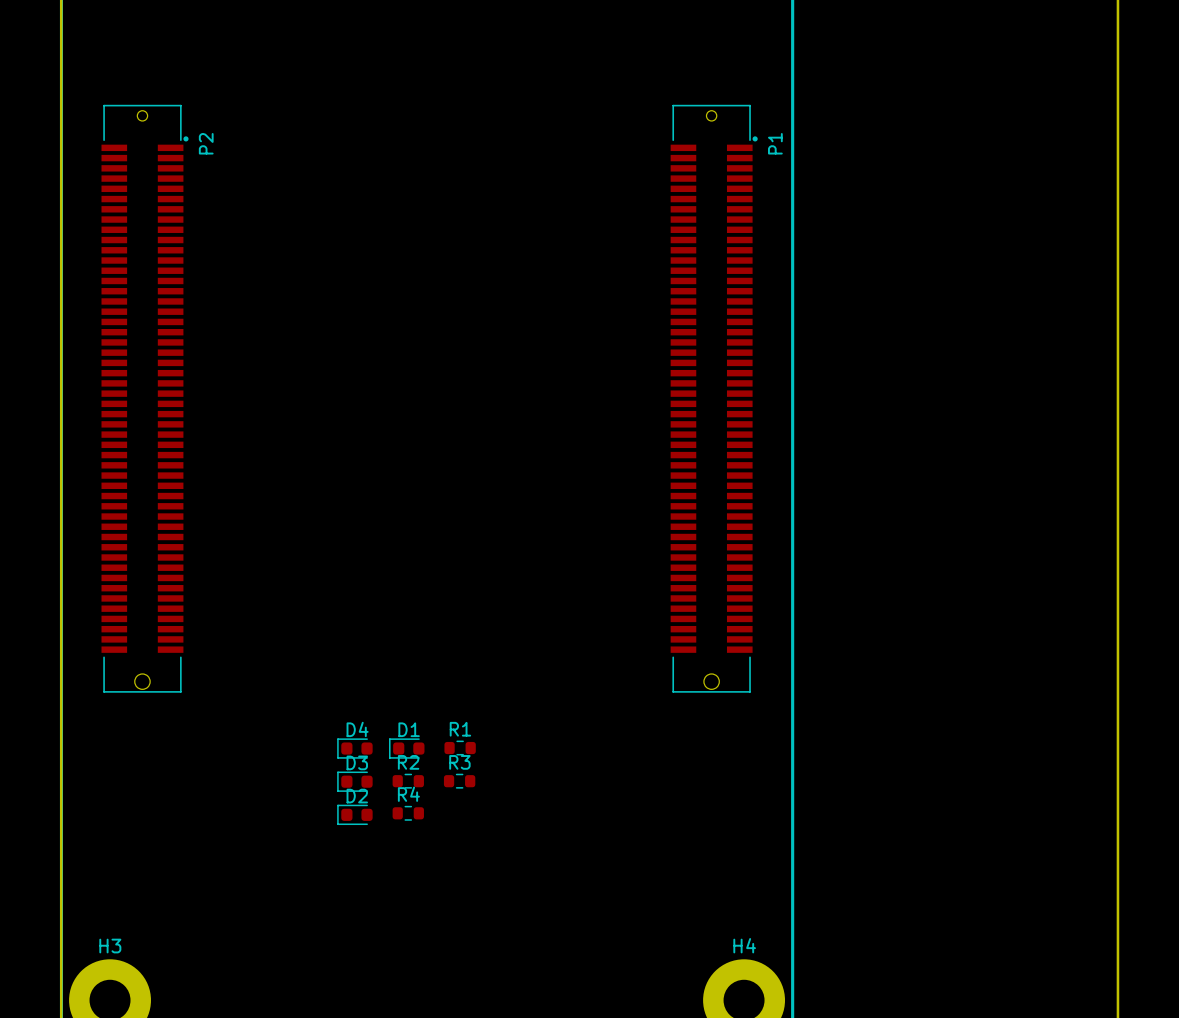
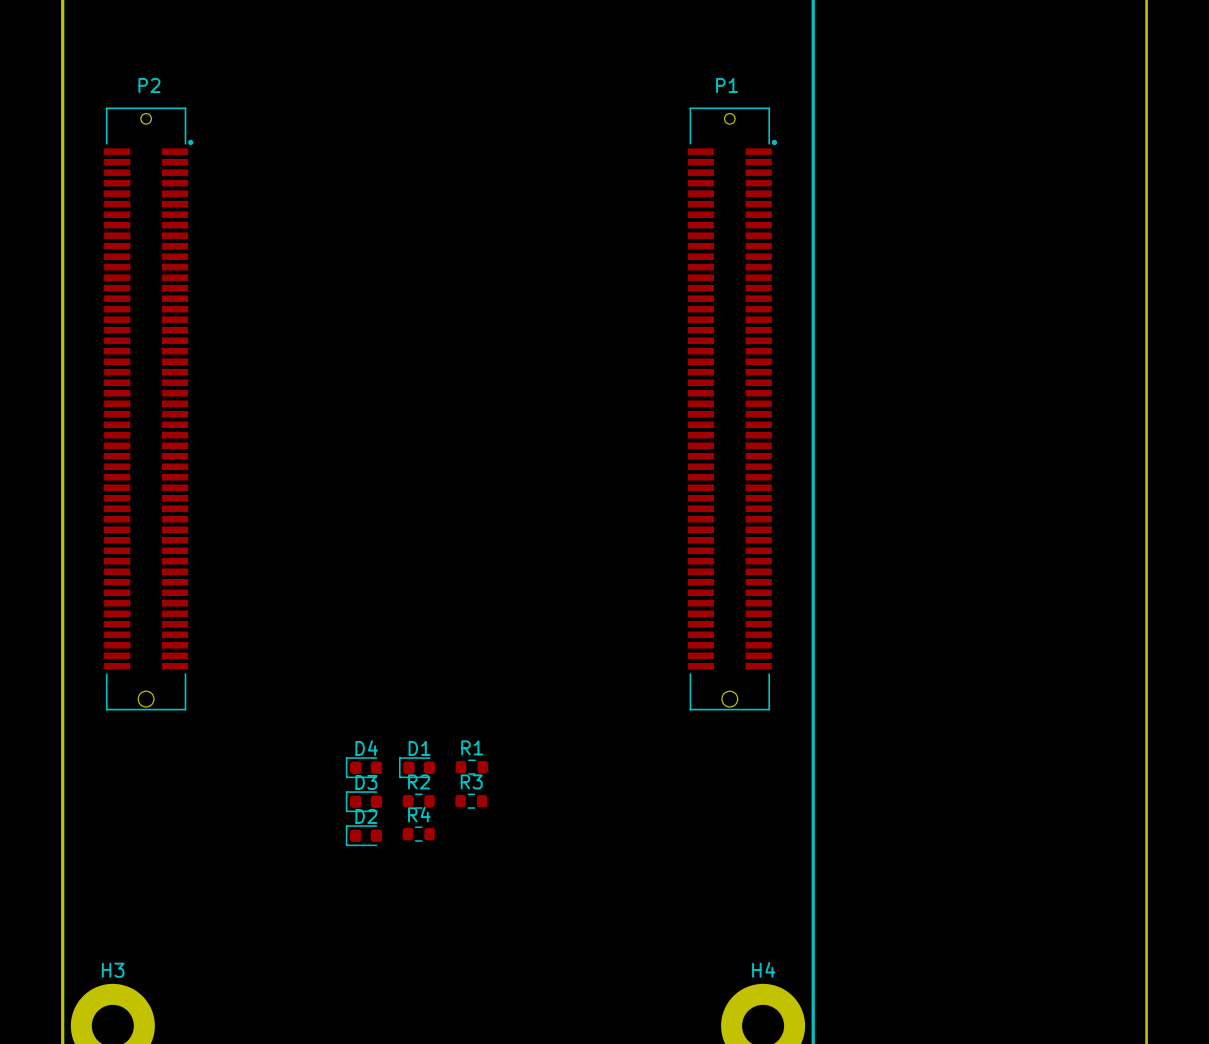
P2 name rotation: 0° (206, 143) -> 90° clockwise (149, 85)
P2 name position: P2 (206, 143) -> P2 (149, 85)
P1 name rotation: 0° (775, 143) -> 90° clockwise (727, 85)
P1 name position: P1 (775, 143) -> P1 (727, 85)

